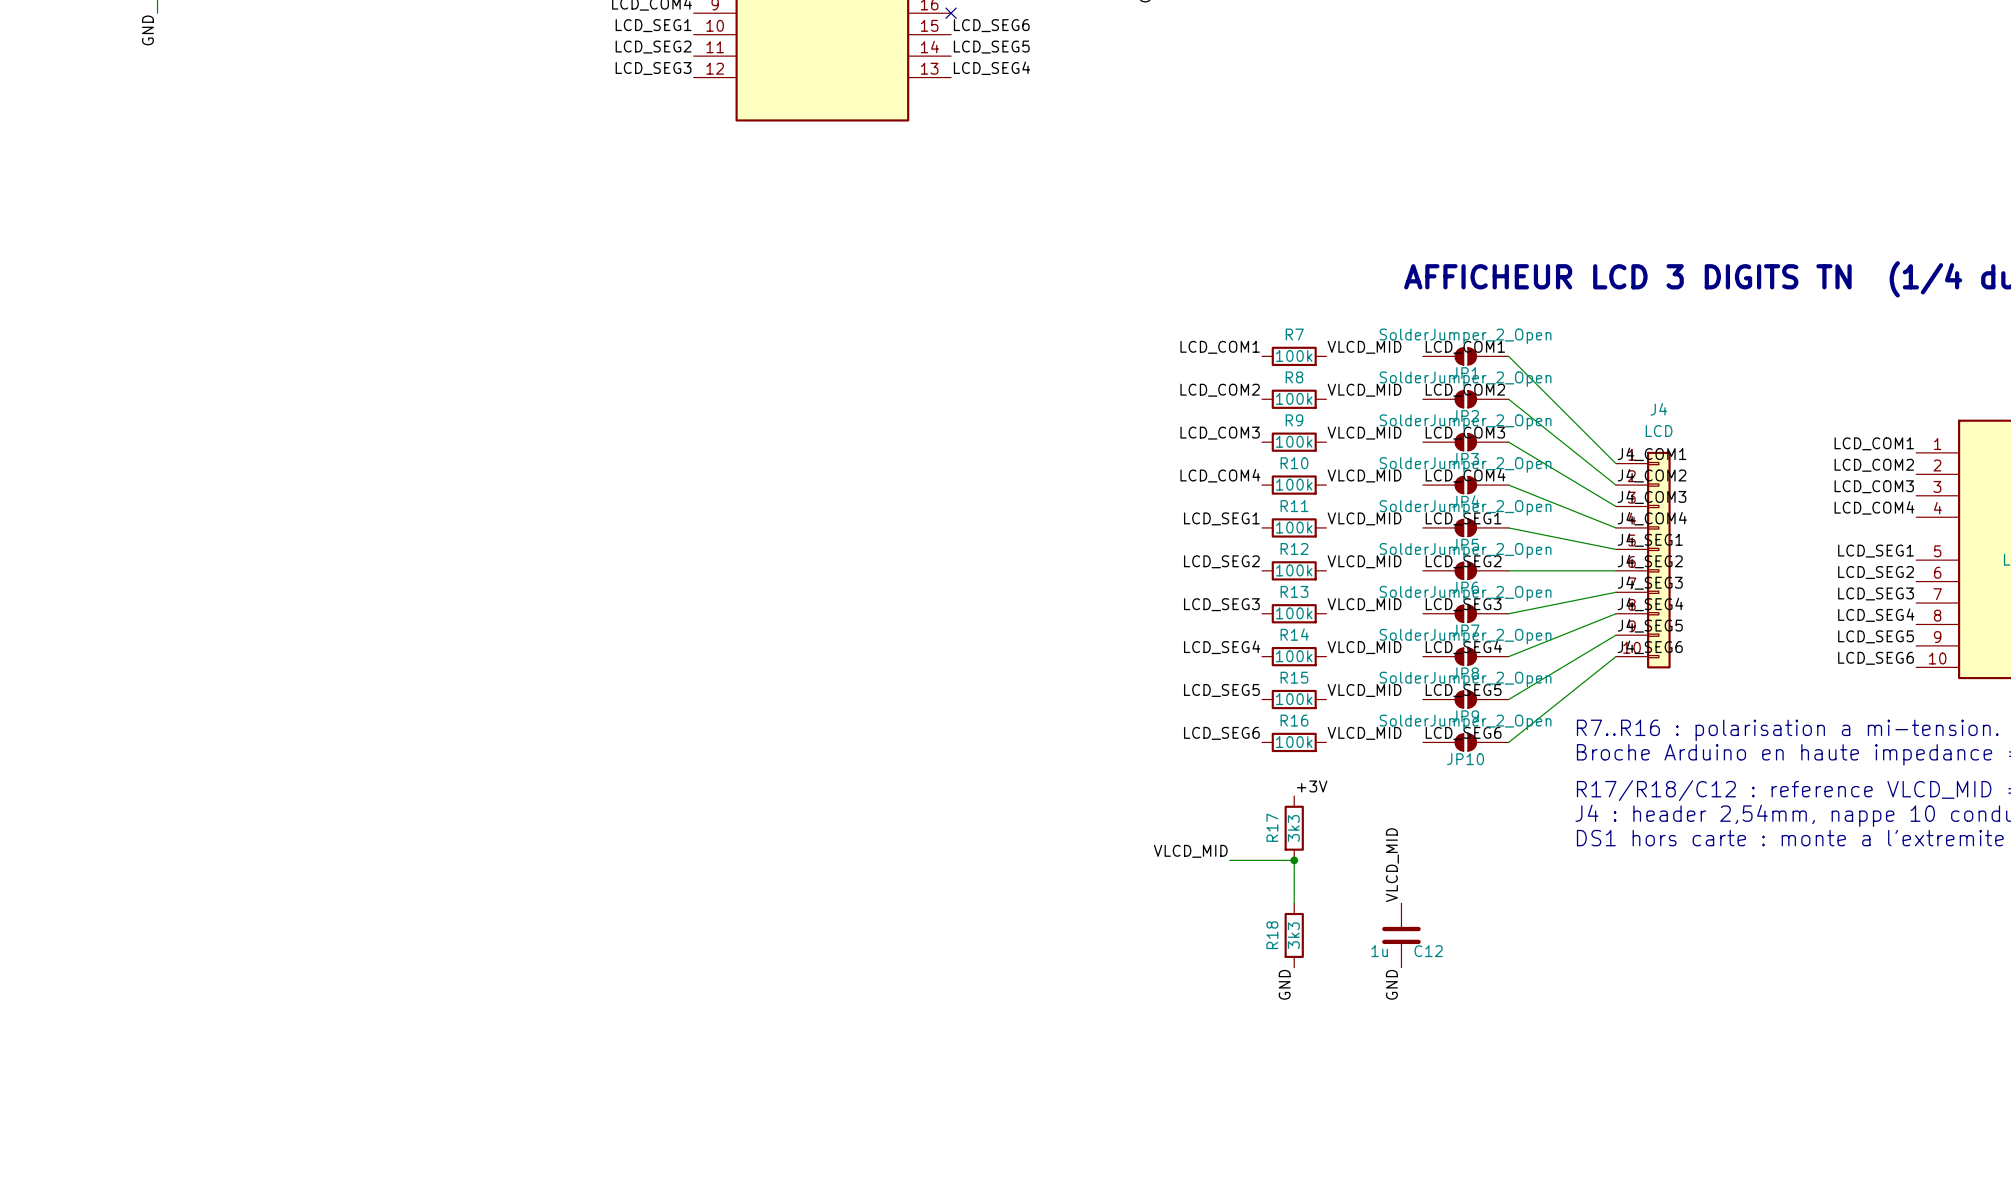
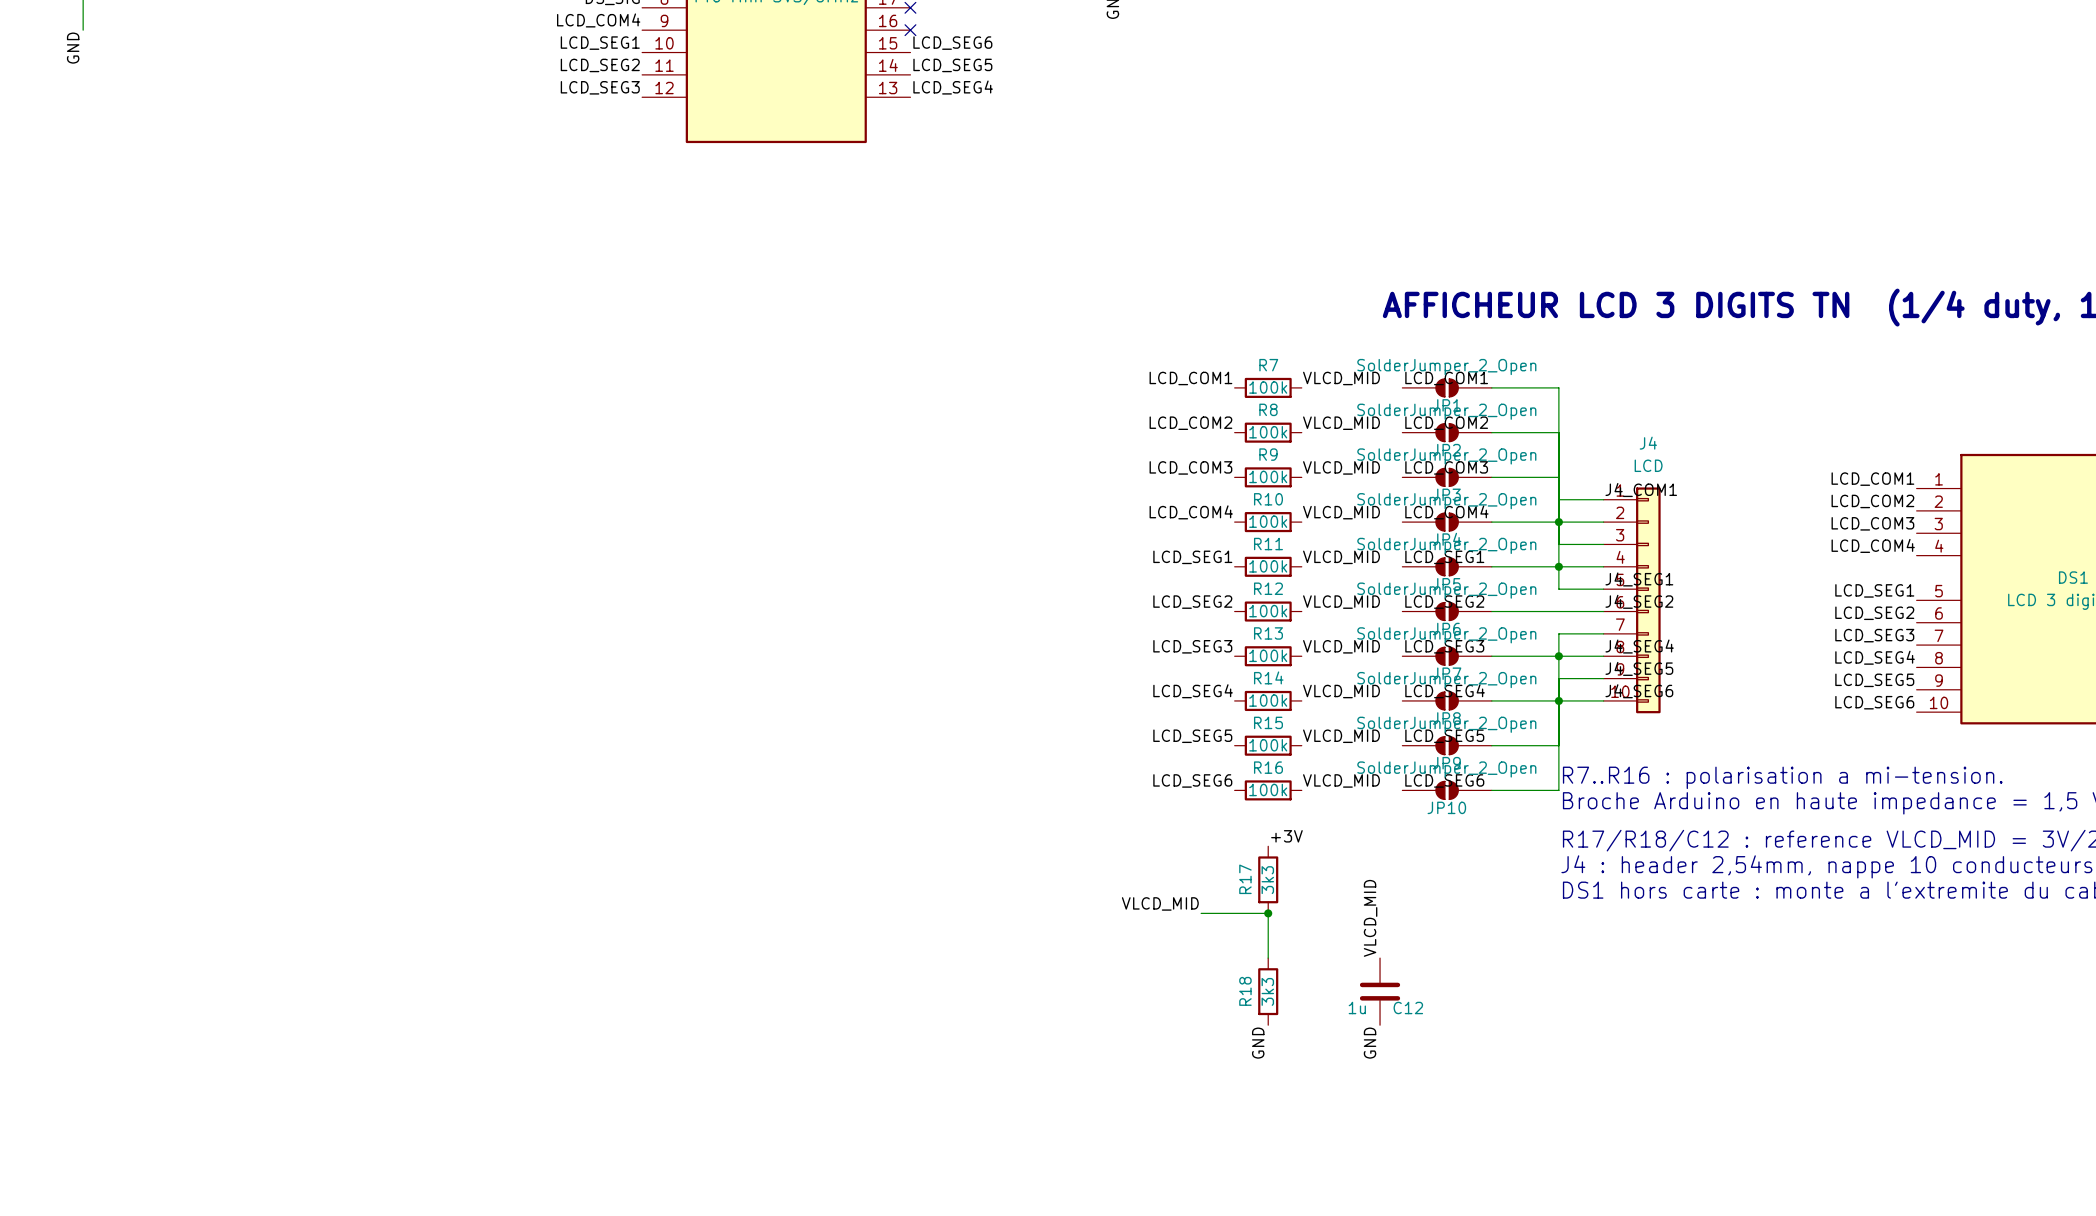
wire: (1508, 356) (1615, 463) -> (1491, 387) (1558, 387) (1558, 589) (1603, 589)
wire: (1508, 399) (1615, 485) -> (1491, 432) (1558, 432)
wire: (1508, 442) (1615, 506) -> (1491, 477) (1558, 477)
wire: none -> (1558, 499) (1603, 499)
label: J4_COM2 (1652, 475) -> none
wire: (1508, 485) (1615, 527) -> (1491, 522) (1603, 522)
junction: none -> (1558, 522)
label: J4_COM3 (1652, 497) -> none
wire: none -> (1558, 544) (1603, 544)
label: J4_COM4 (1652, 518) -> none
wire: (1508, 527) (1615, 549) -> (1491, 566) (1603, 566)
junction: none -> (1558, 566)
label: J4_SEG3 (1650, 582) -> none
wire: (1615, 592) (1508, 613) -> (1603, 656) (1491, 656)
junction: none -> (1558, 656)
wire: (1615, 613) (1508, 656) -> (1603, 700) (1491, 700)
wire: none -> (1558, 678) (1603, 678)
wire: (1615, 635) (1508, 699) -> (1558, 745) (1491, 745)
junction: none -> (1558, 700)
wire: (1615, 656) (1508, 742) -> (1603, 633) (1558, 633) (1558, 790) (1491, 790)

